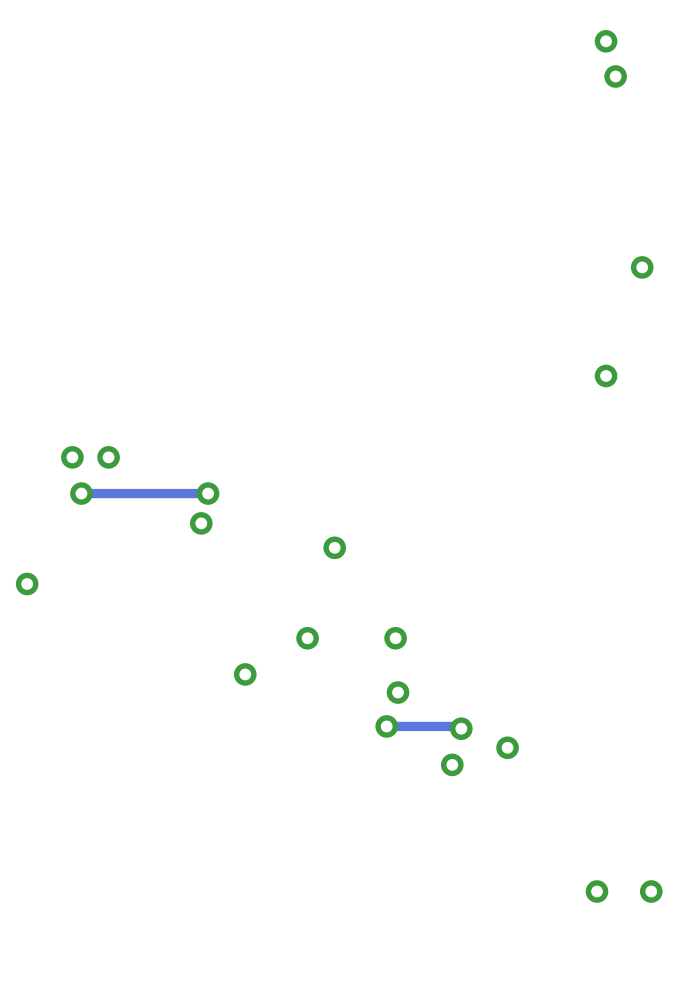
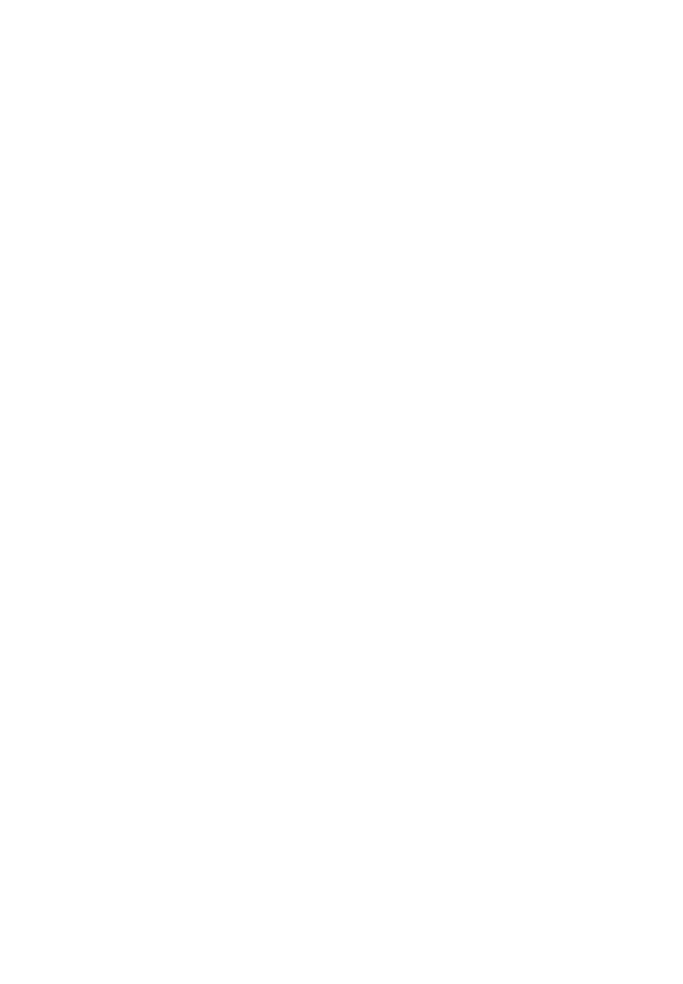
via: (606, 41) -> none
via: (615, 76) -> none
via: (642, 267) -> none
via: (606, 375) -> none
via: (72, 457) -> none
via: (108, 457) -> none
via: (81, 493) -> none
track: (208, 493) (81, 493) -> none
via: (208, 493) -> none
via: (201, 523) -> none
via: (334, 547) -> none
via: (27, 583) -> none
via: (307, 638) -> none
via: (395, 638) -> none
via: (245, 674) -> none
via: (398, 692) -> none
track: (386, 726) (459, 726) (461, 728) -> none
via: (386, 726) -> none
via: (461, 728) -> none
via: (507, 747) -> none
via: (452, 764) -> none
via: (597, 891) -> none
via: (651, 891) -> none

